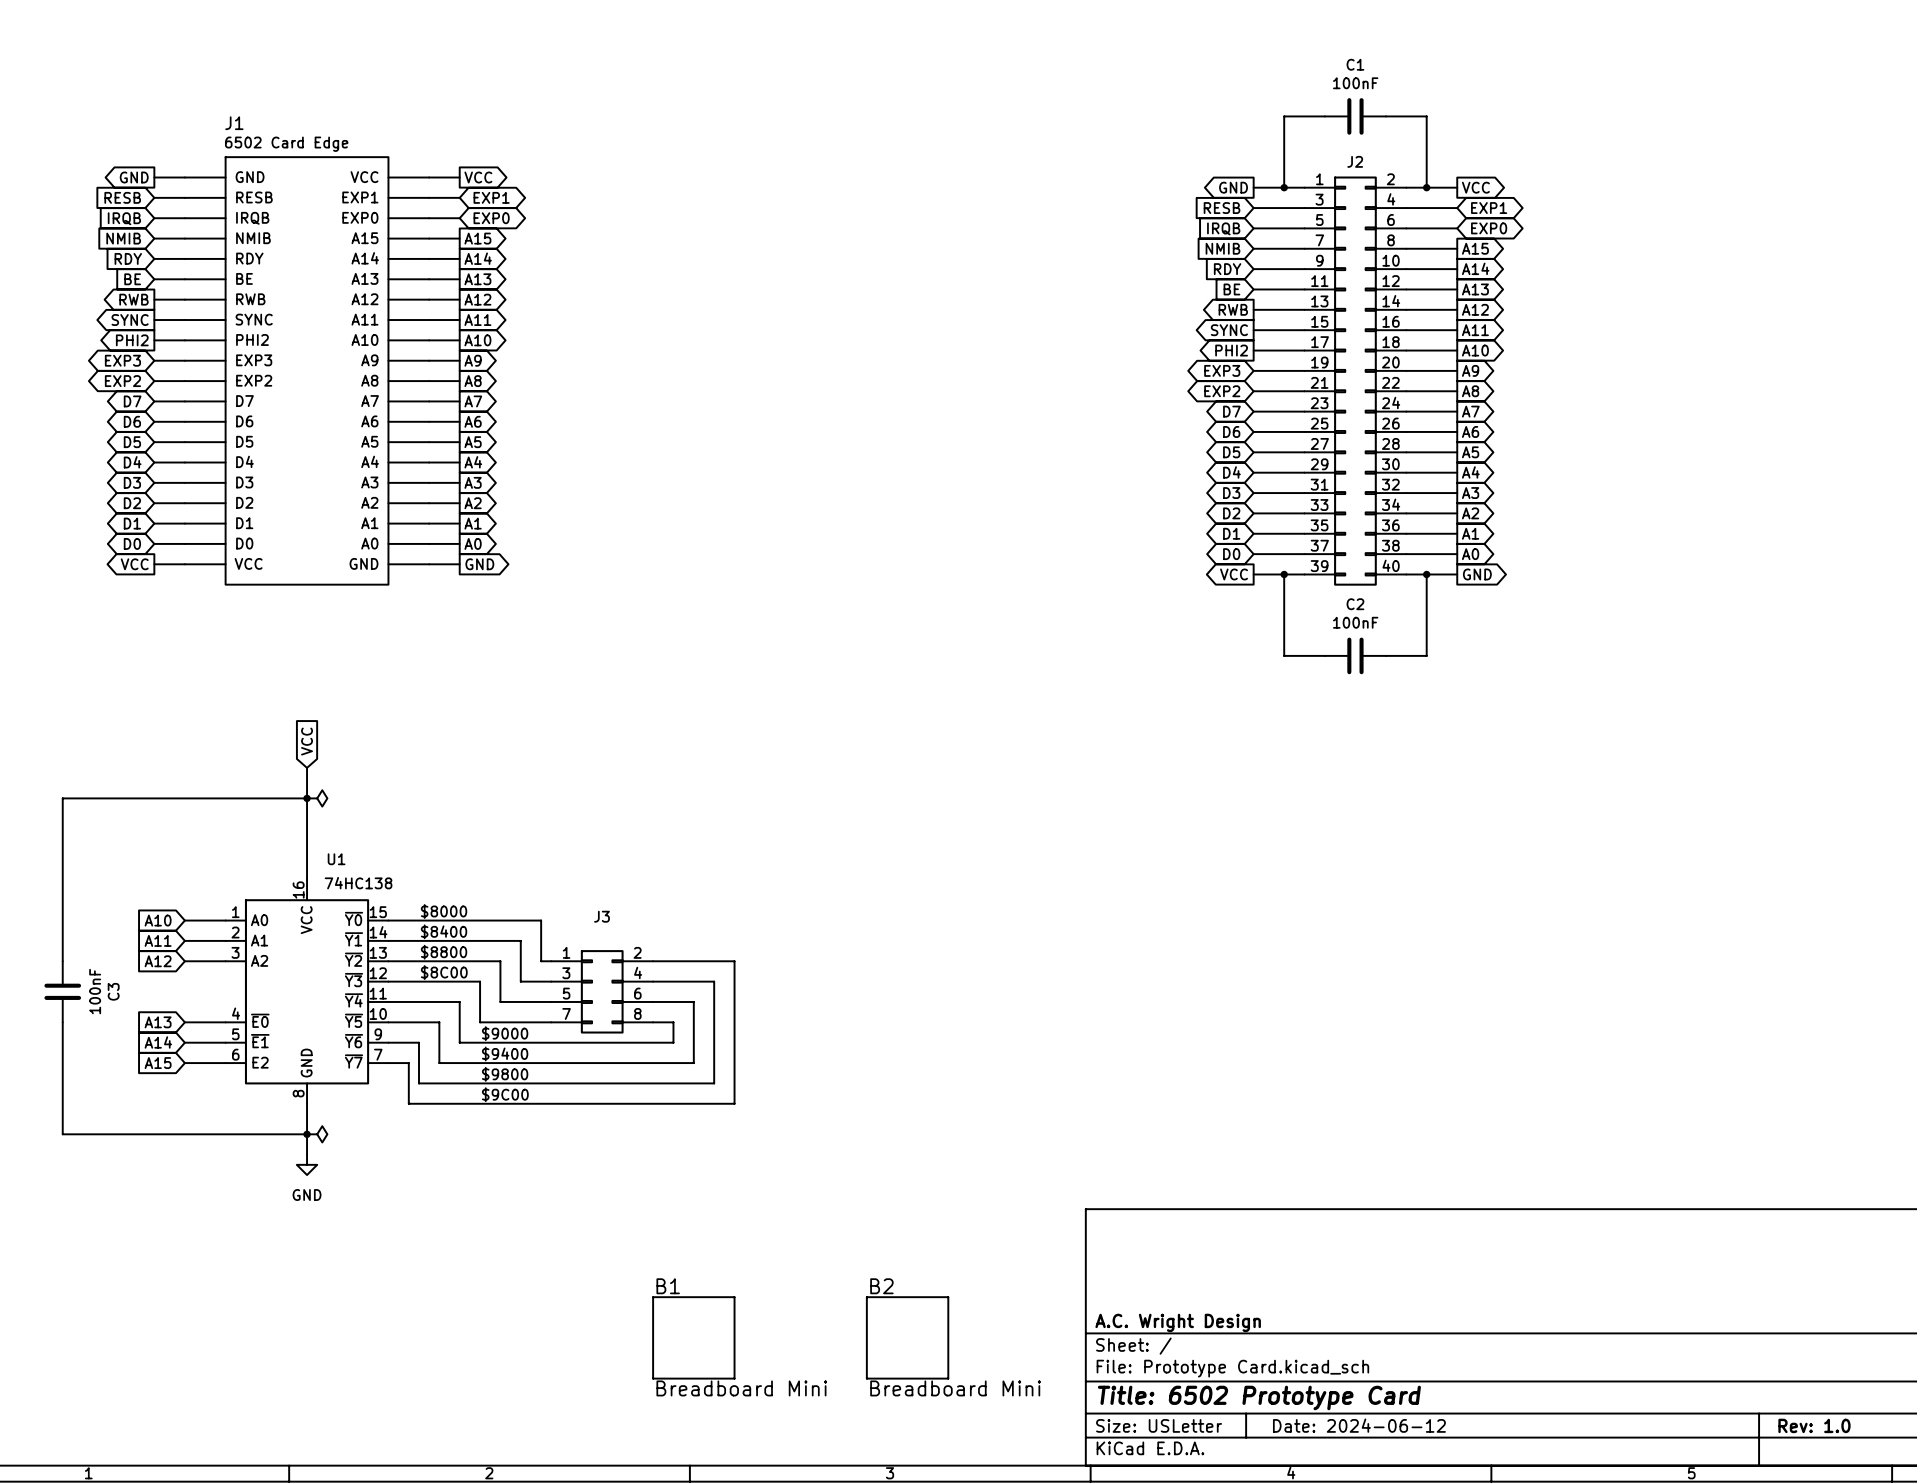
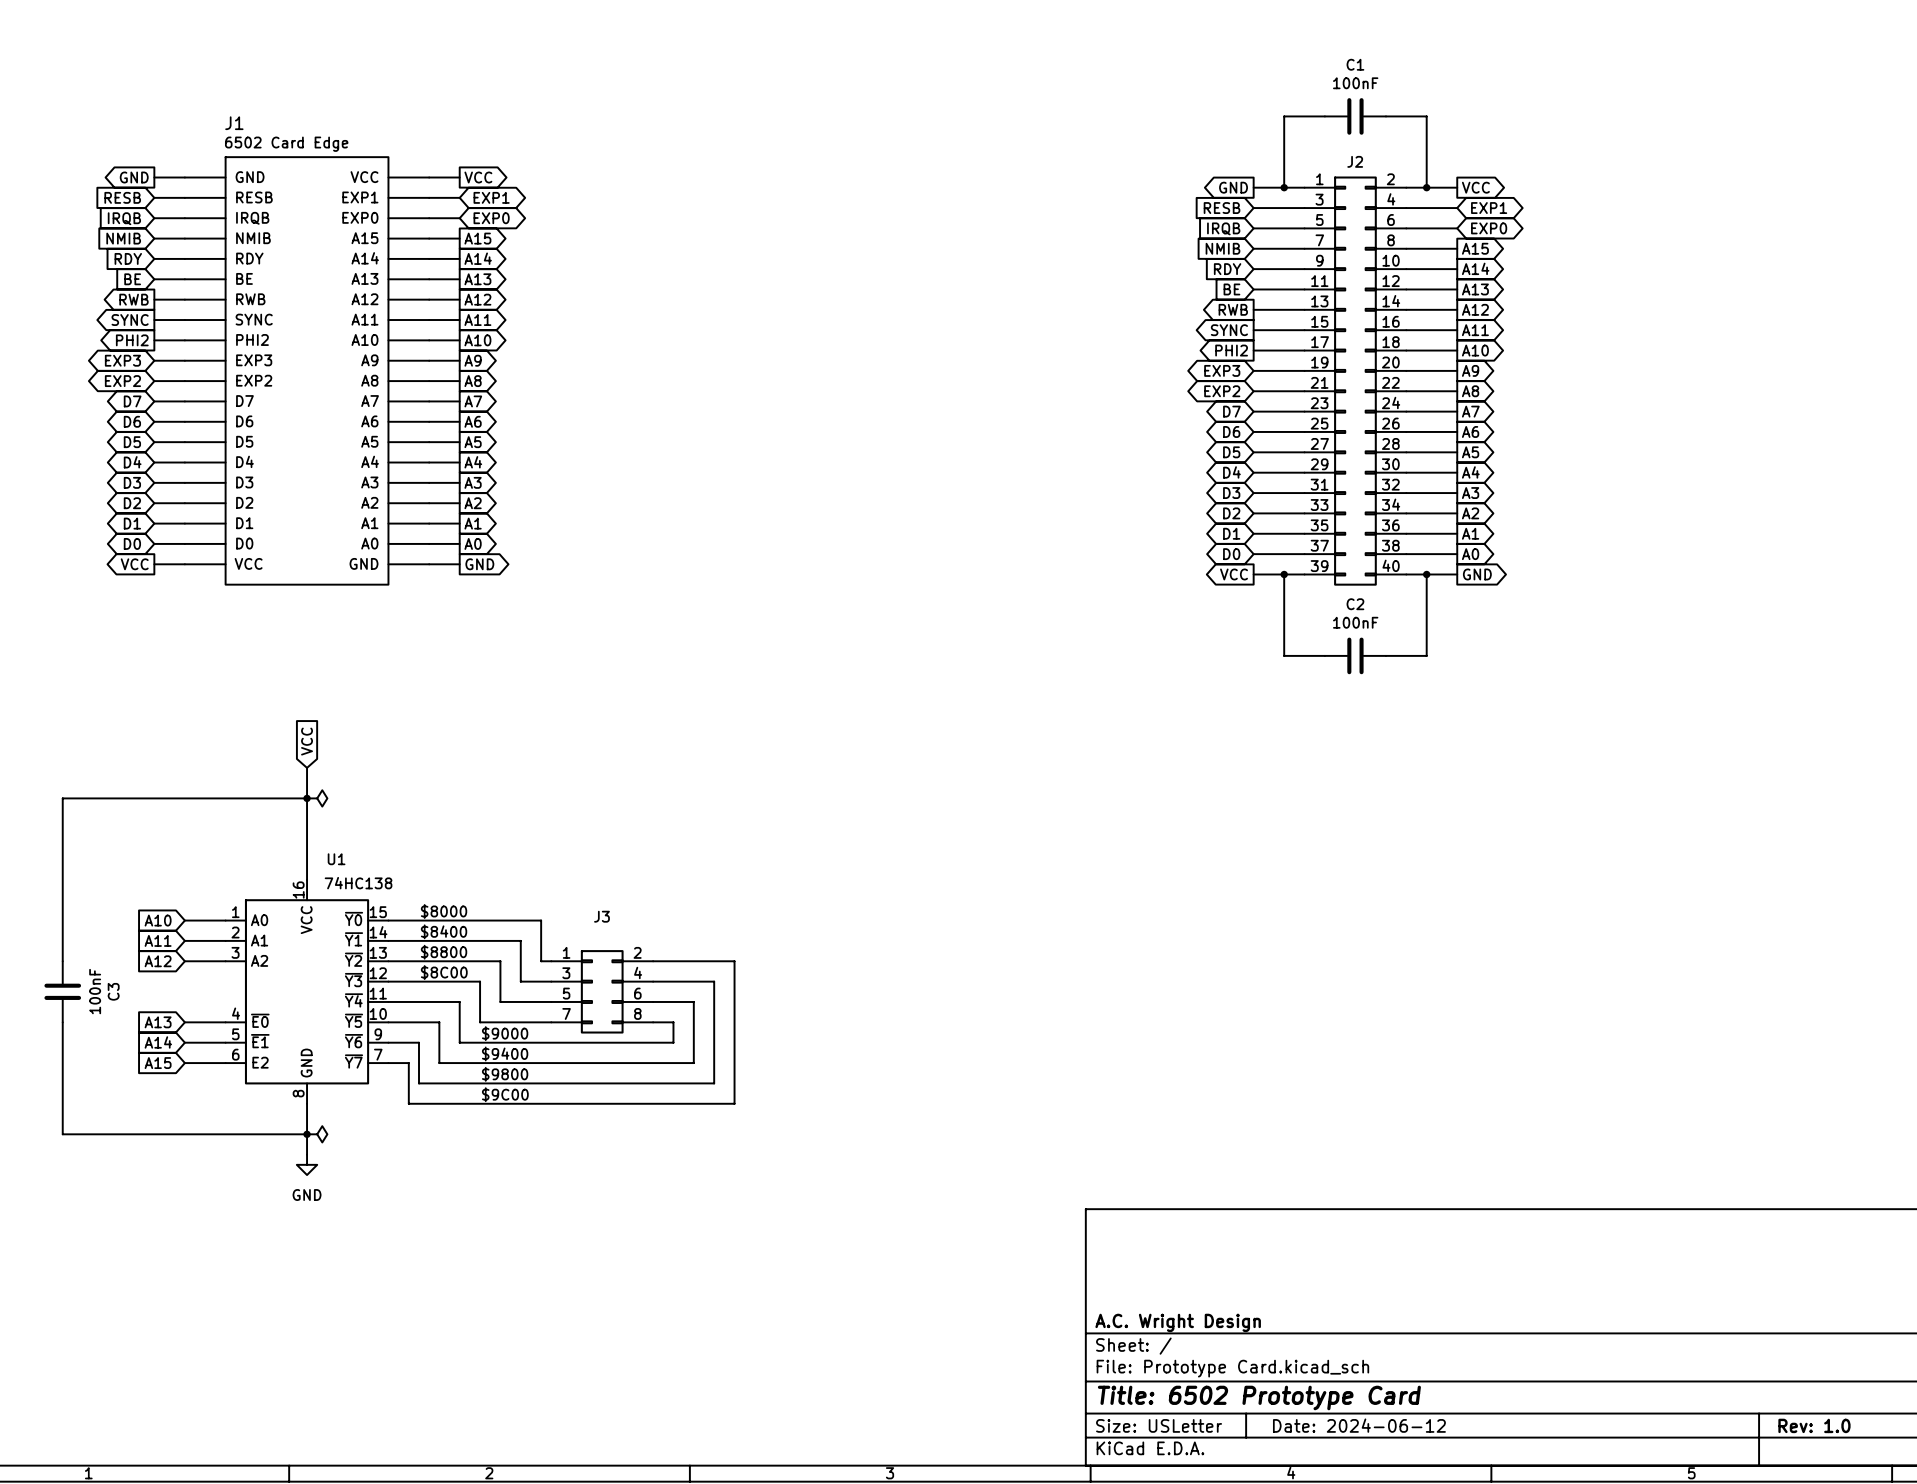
B1: Breadboard Mini (693, 1337) -> none
B2: Breadboard Mini (907, 1337) -> none

